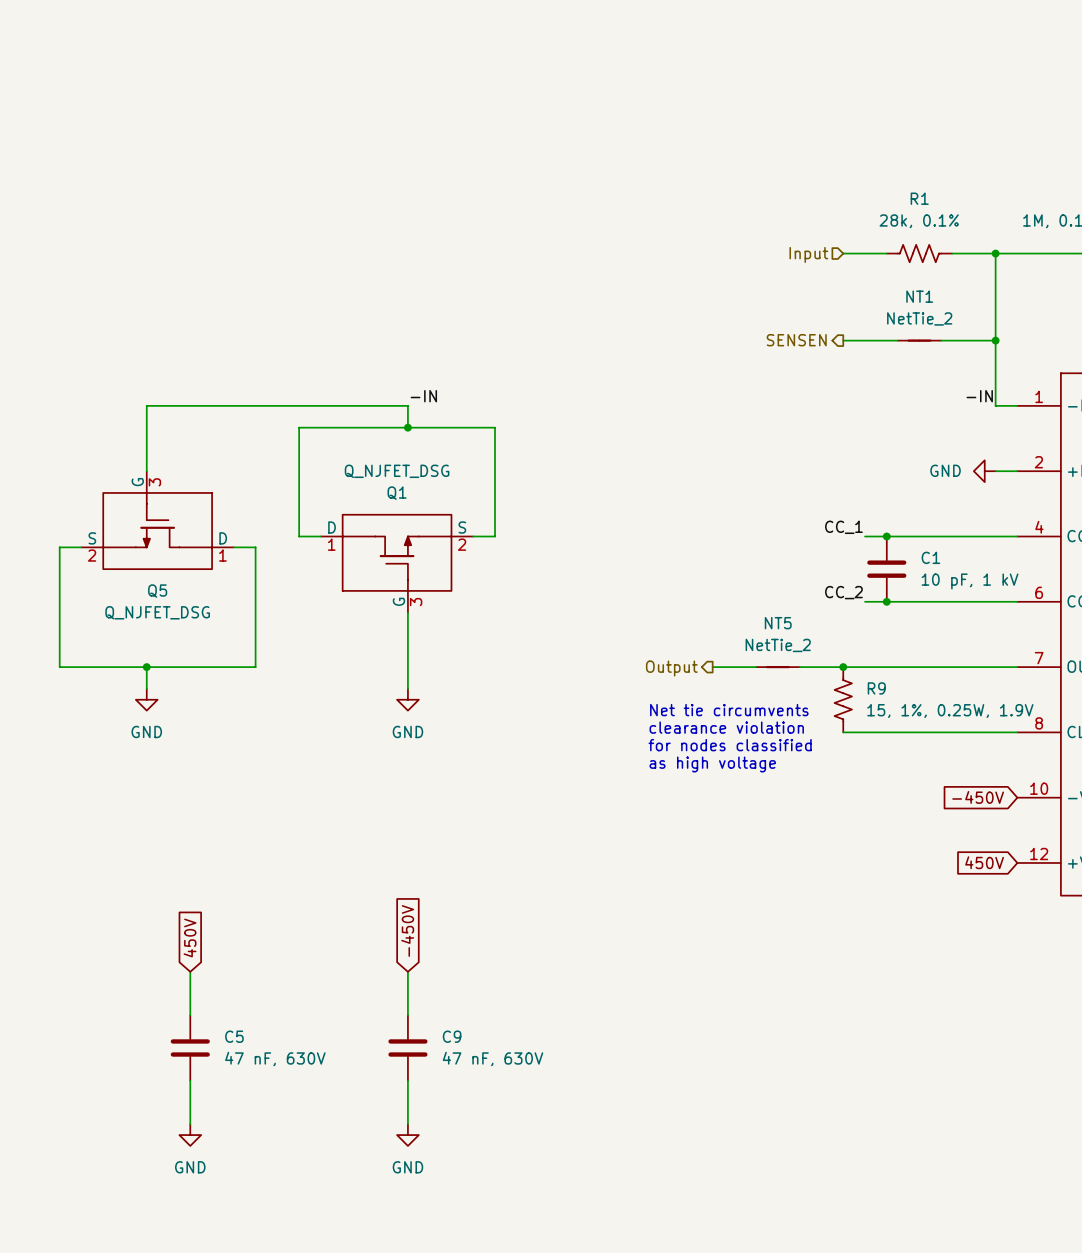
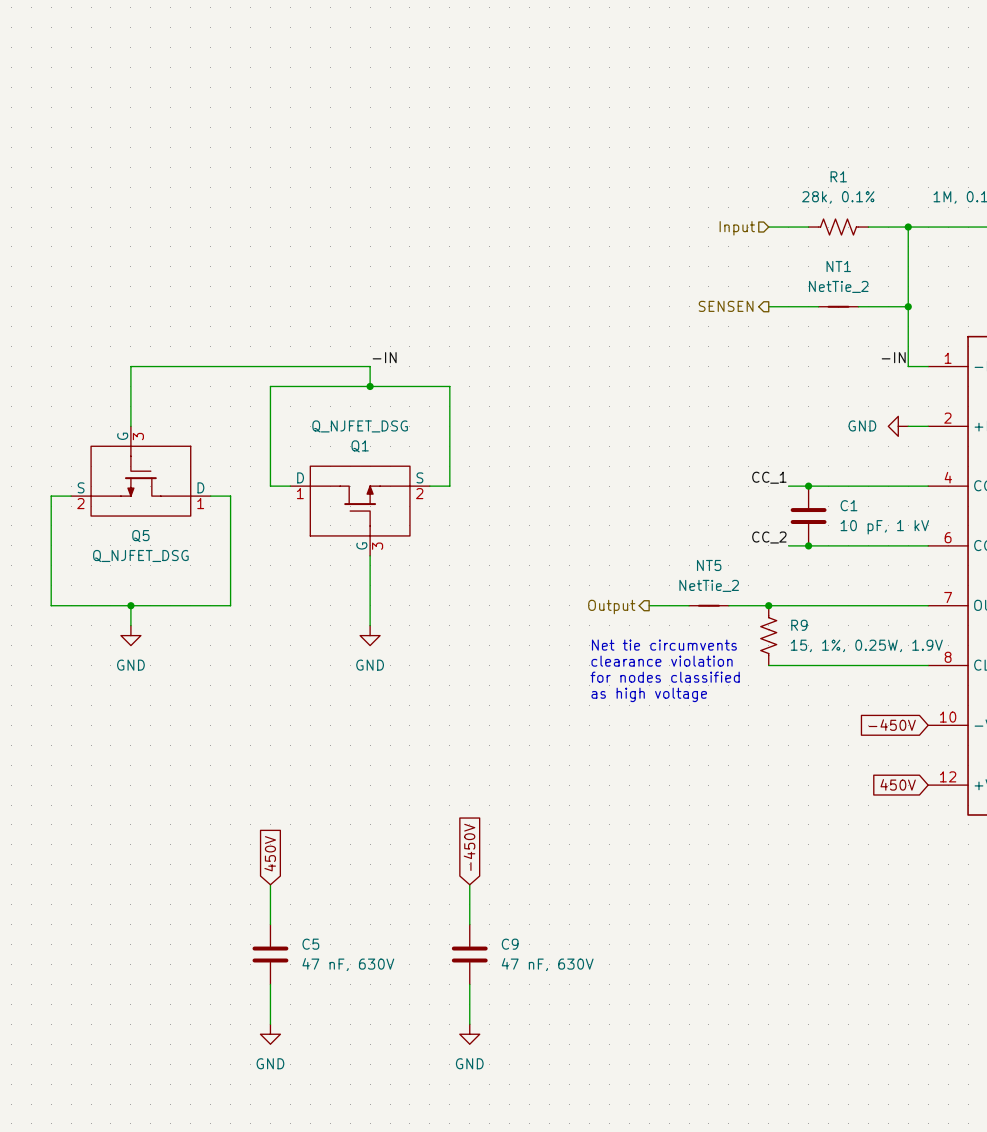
global label position: -450V (407, 930) -> -450V (469, 847)
global label position: 450V (190, 937) -> 450V (270, 853)
wire: (190, 971) (190, 1015) -> (270, 884) (270, 924)
wire: (407, 971) (407, 1015) -> (469, 884) (469, 924)
C5 position: (190, 1047) -> (270, 954)
C9 position: (407, 1047) -> (469, 954)
wire: (190, 1080) (190, 1124) -> (270, 984) (270, 1024)
wire: (407, 1080) (407, 1124) -> (469, 984) (469, 1024)
power symbol: GND (190, 1135) -> none
power symbol: none -> GND (270, 1034)
power symbol: GND (407, 1135) -> none
power symbol: none -> GND (469, 1034)

